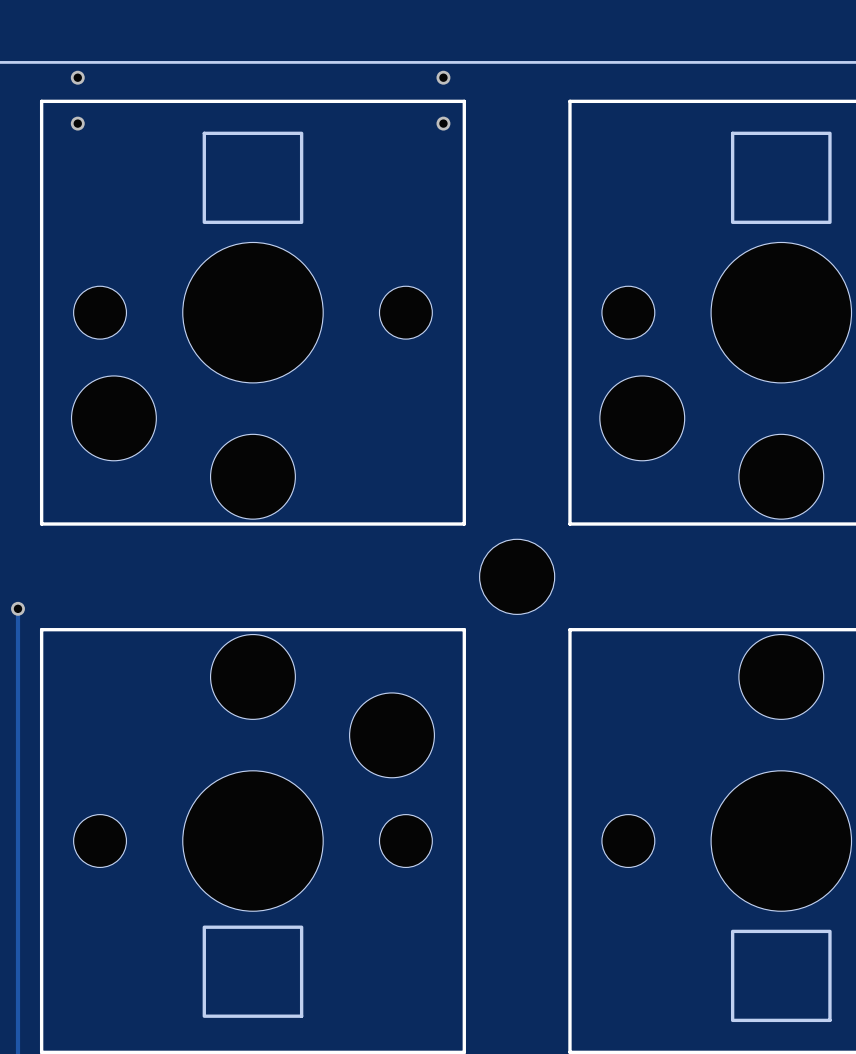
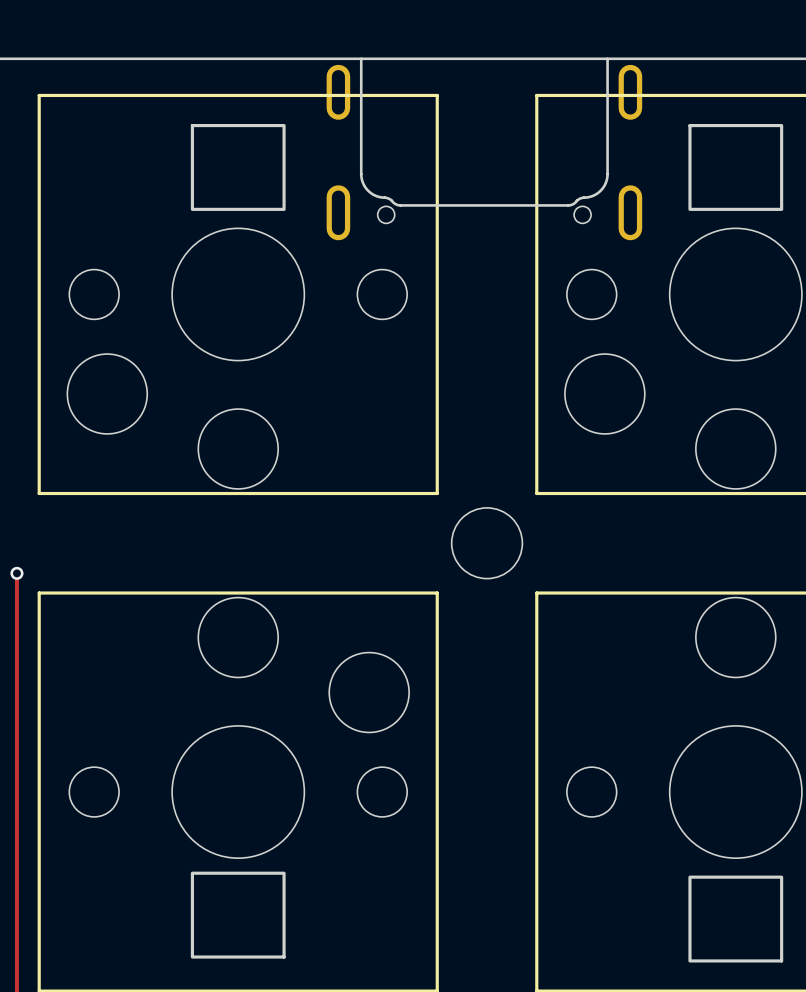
via: (77, 77) -> none
via: (443, 77) -> none
via: (77, 123) -> none
via: (443, 123) -> none
part: none -> (484, 148)

